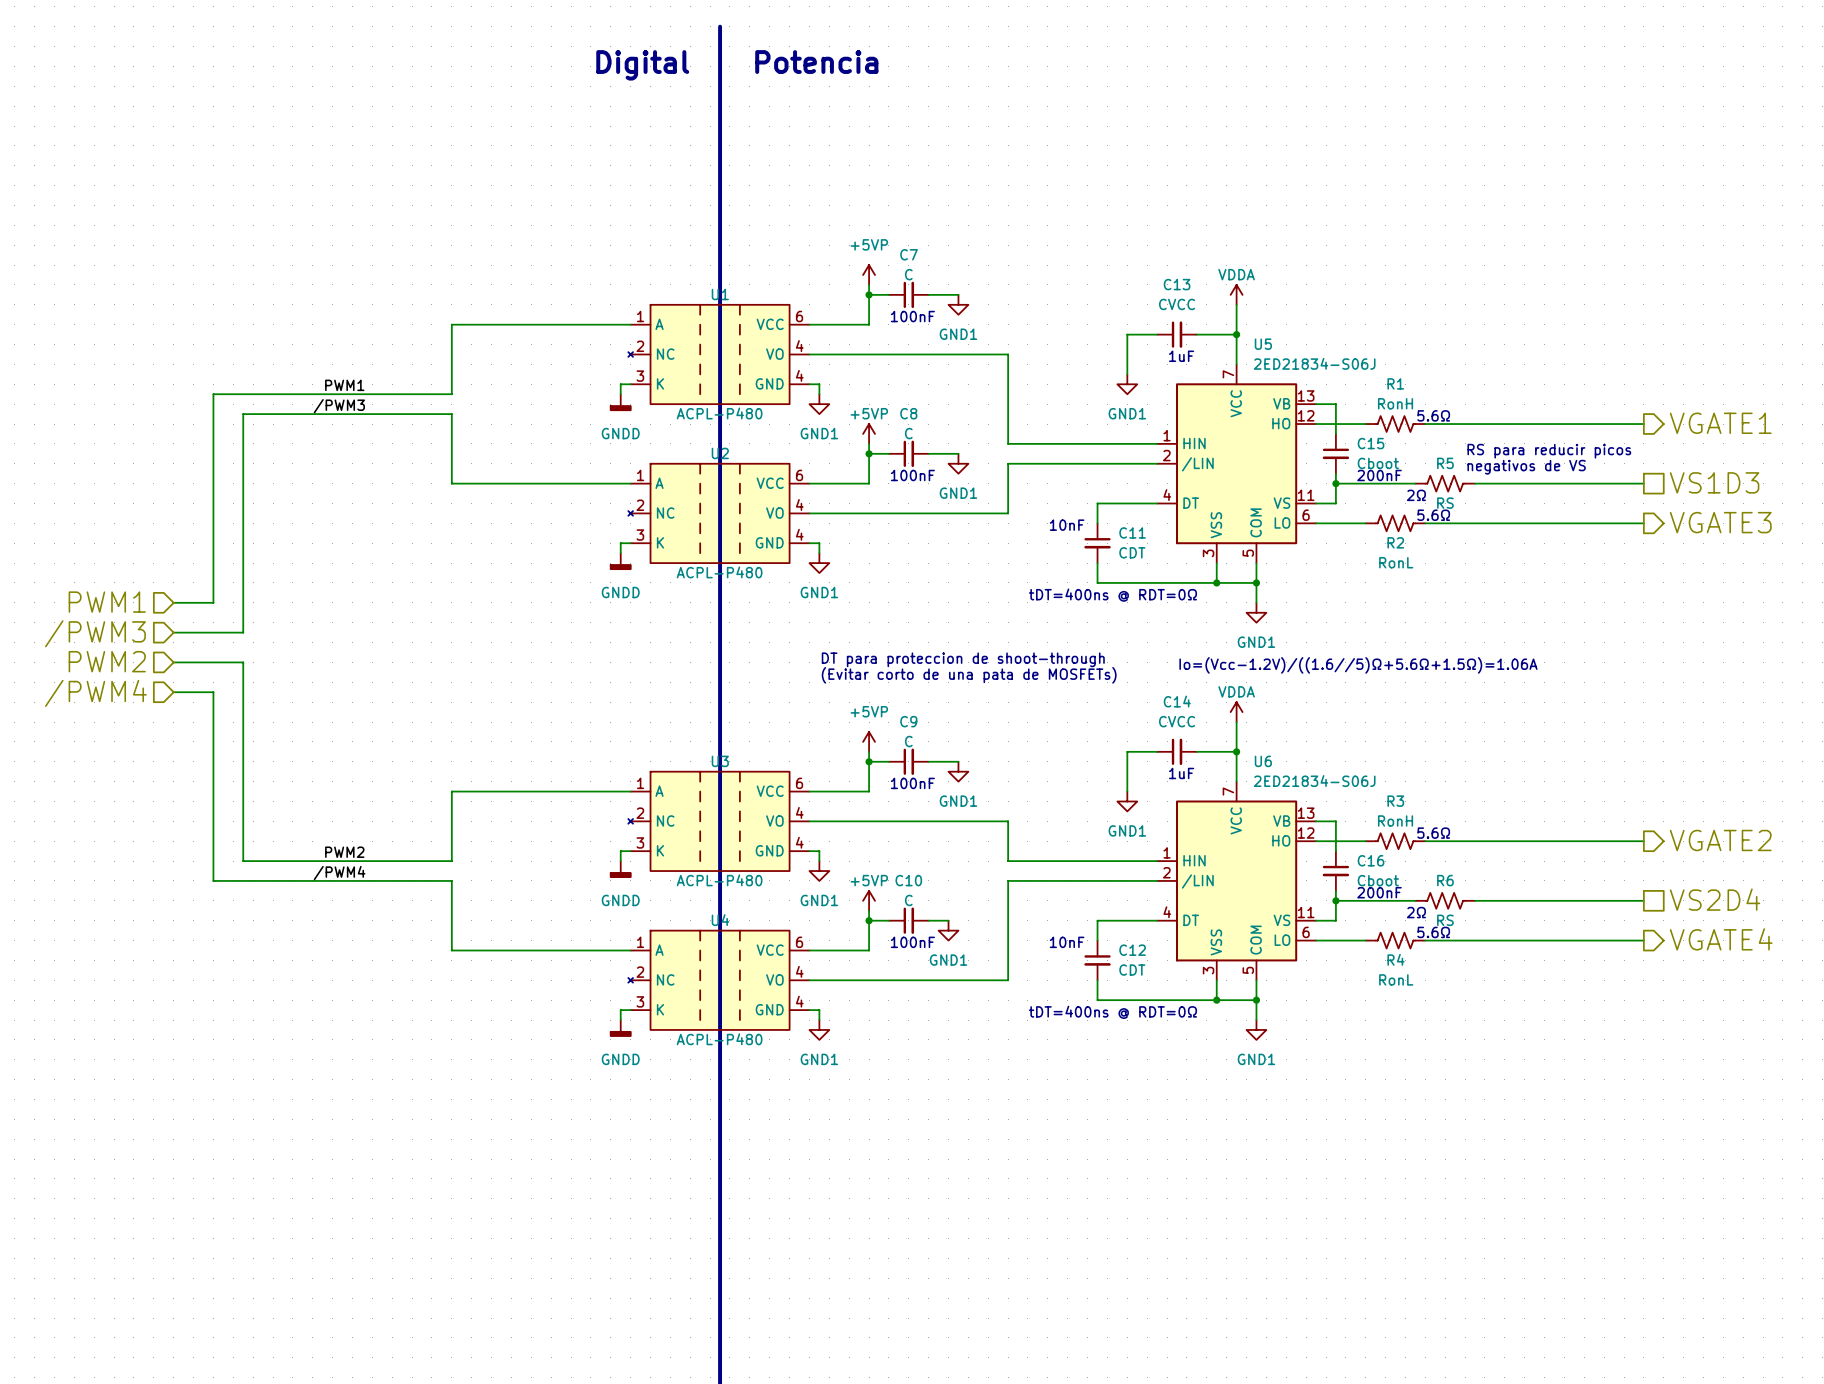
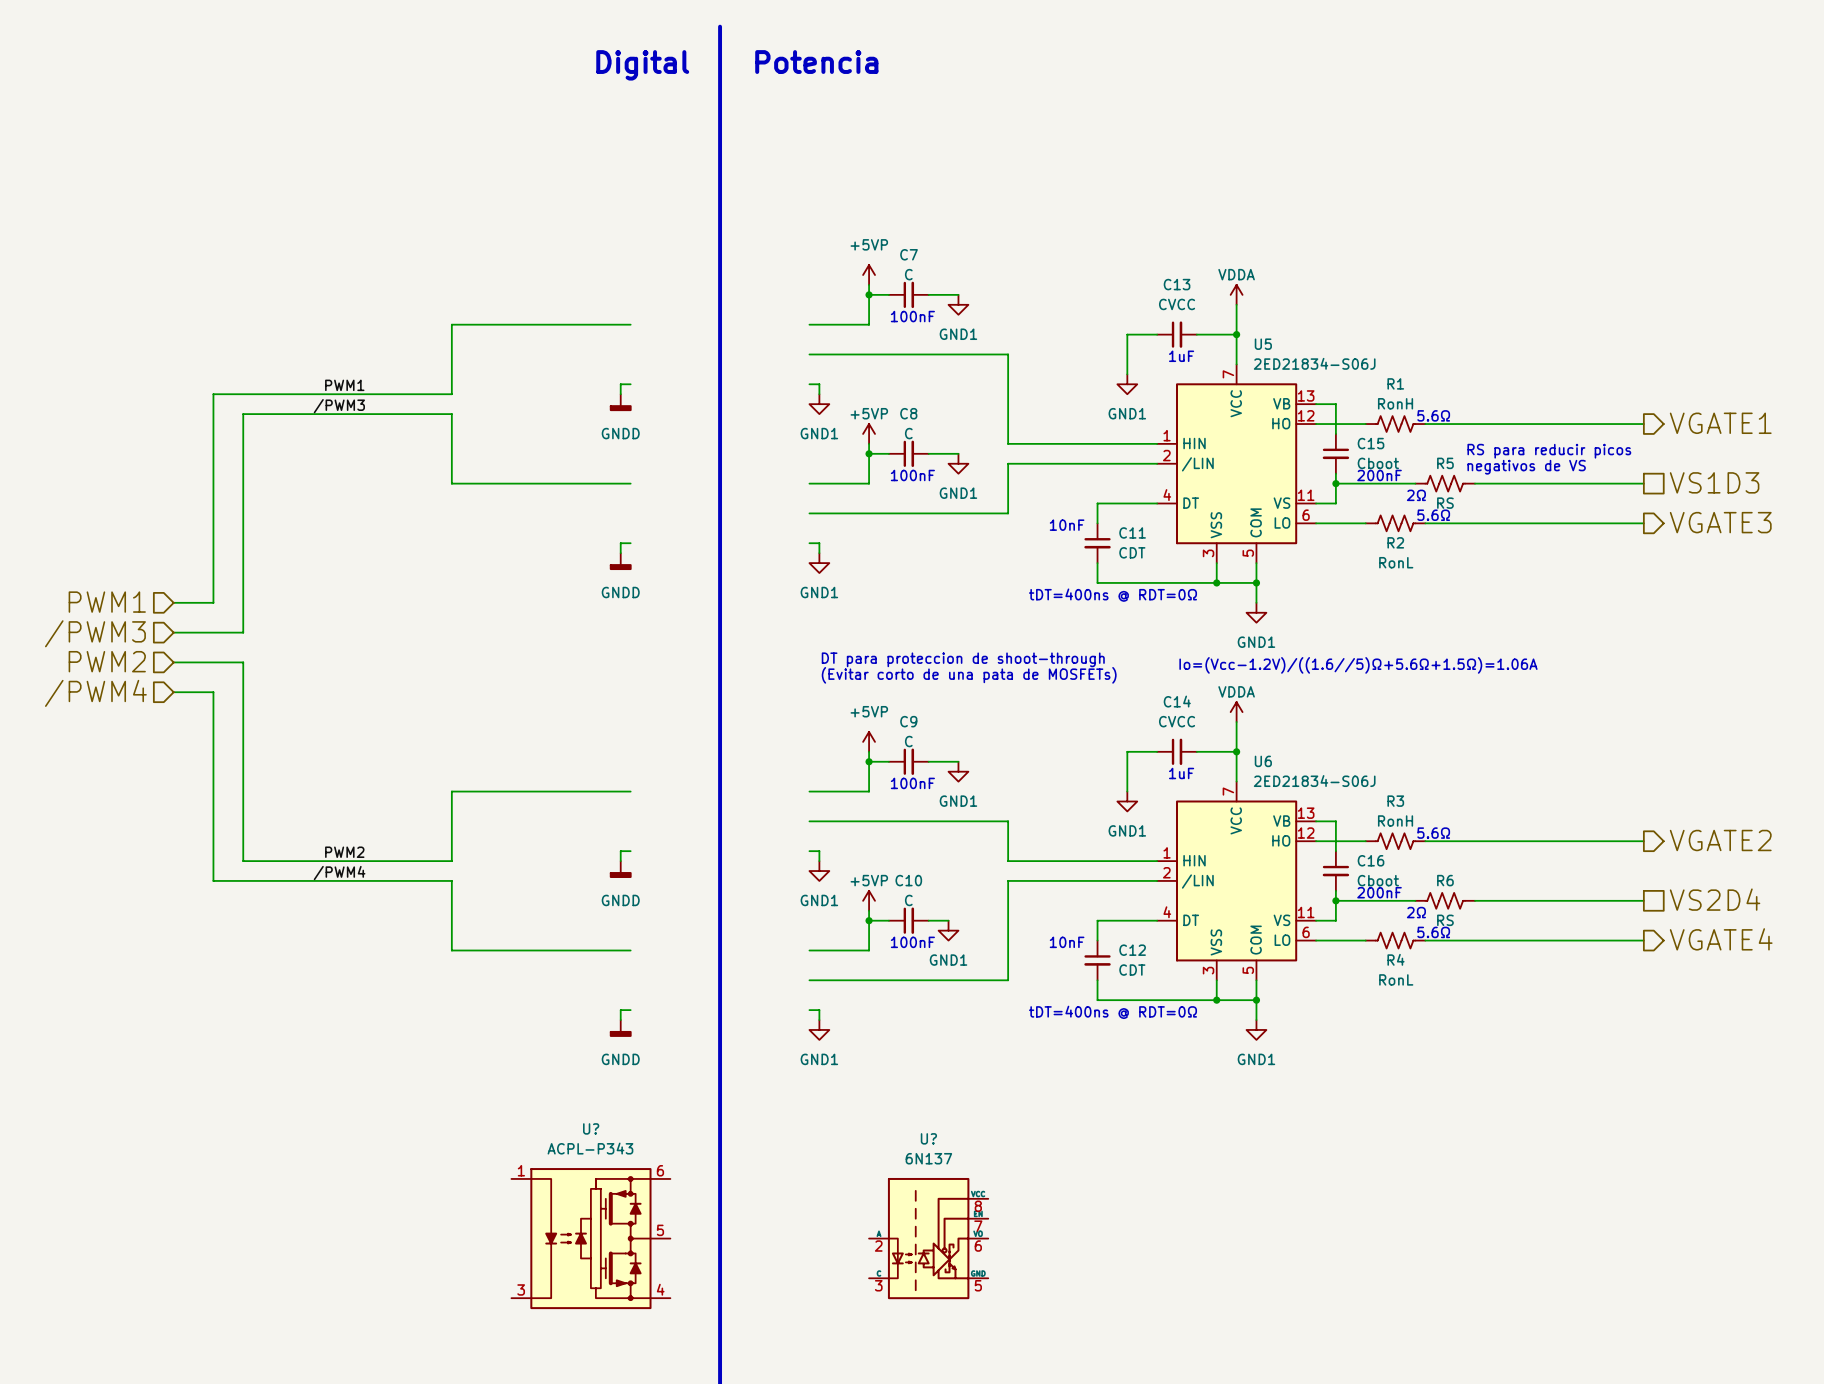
U1: ACPL-P480 (718, 354) -> none
U2: ACPL-P480 (718, 513) -> none
U3: ACPL-P480 (718, 821) -> none
U4: ACPL-P480 (718, 980) -> none
U?: none -> ACPL-P343 (590, 1238)
U?: none -> 6N137 (928, 1238)

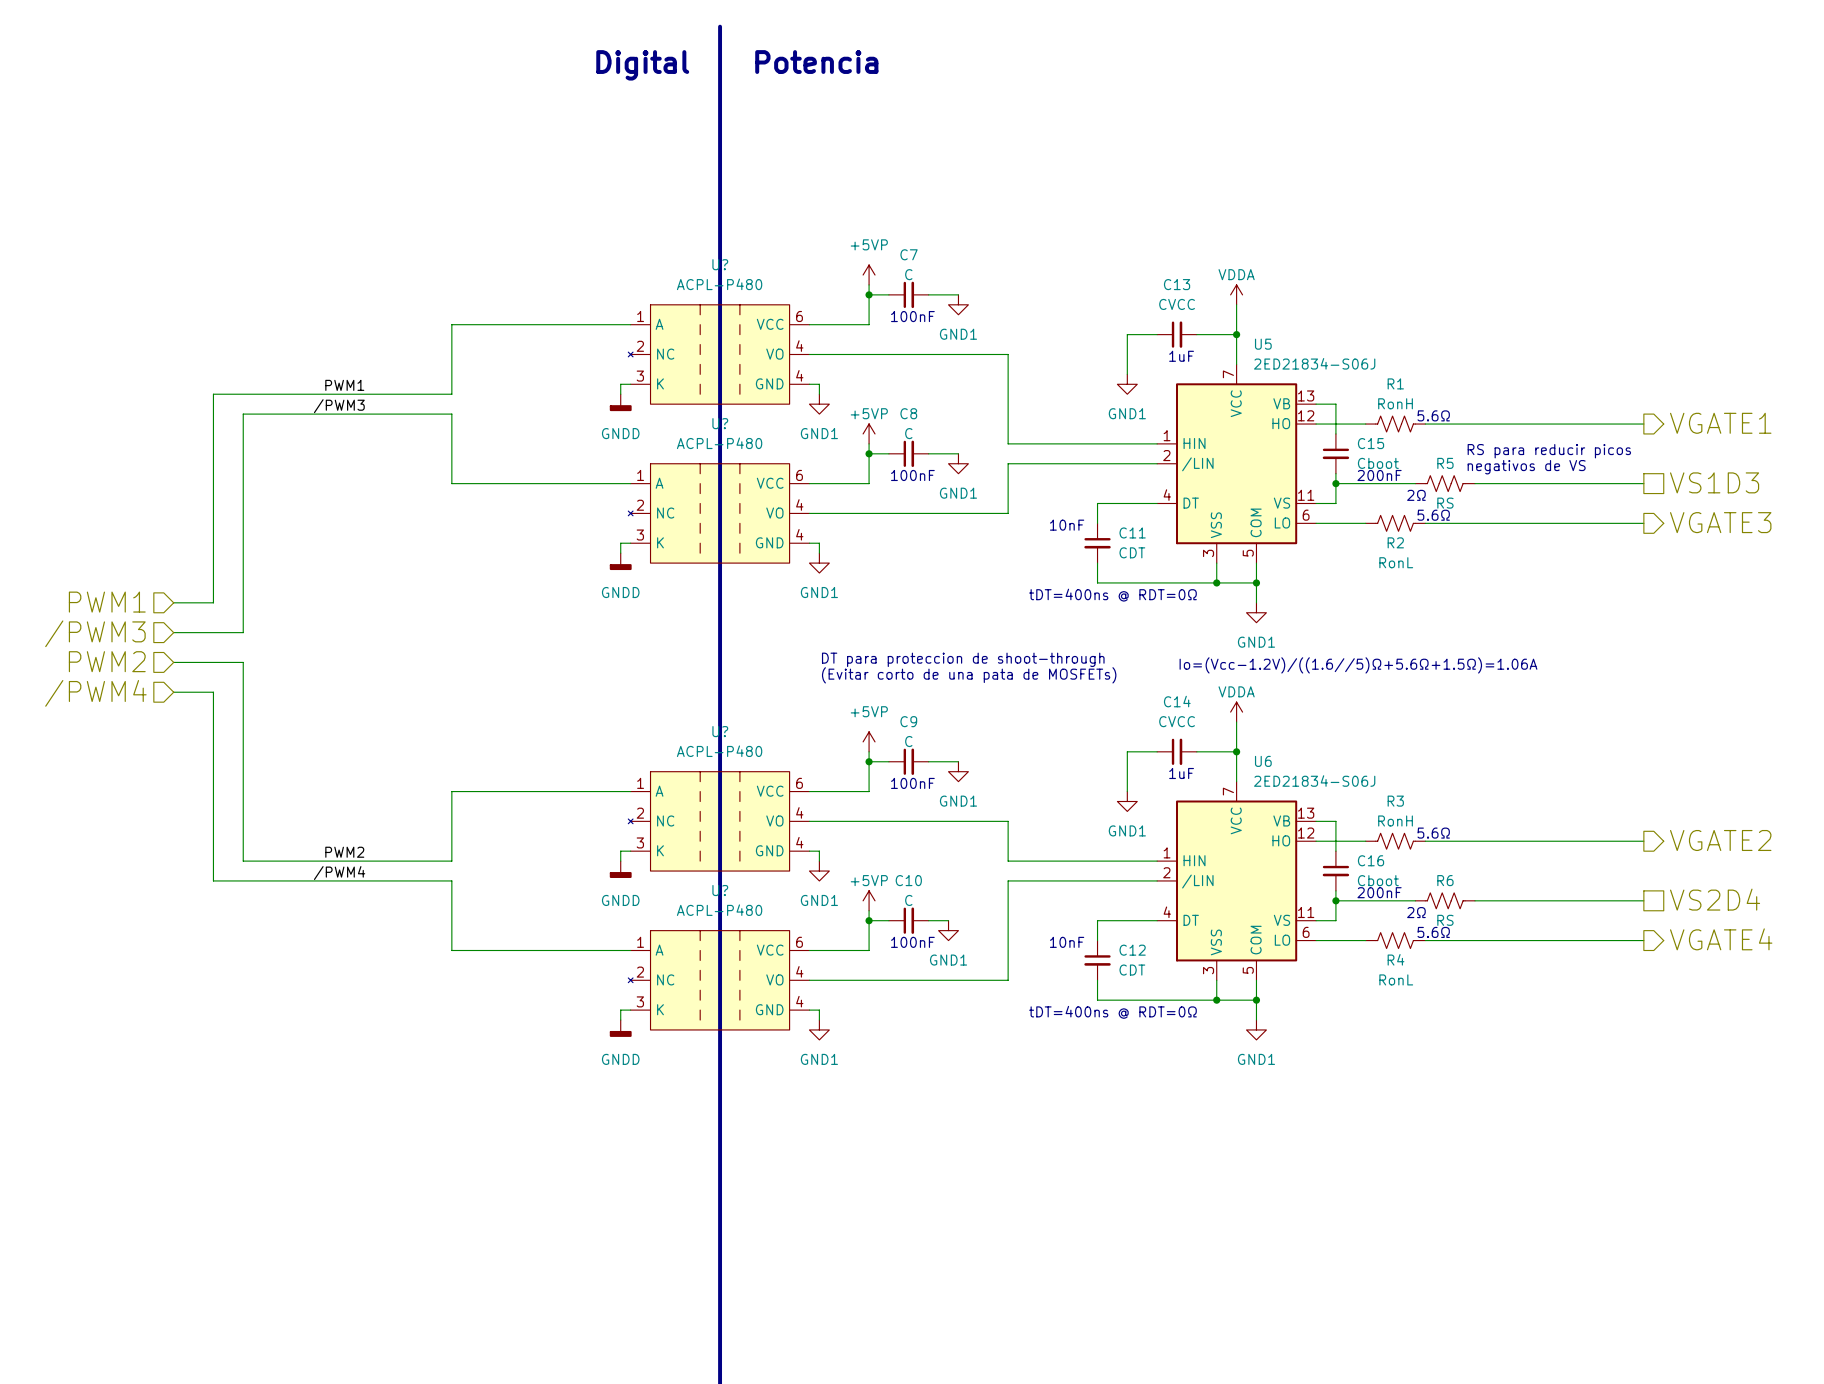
U?: none -> ACPL-P480 (718, 354)
U?: none -> ACPL-P480 (718, 513)
U?: none -> ACPL-P480 (718, 821)
U?: none -> ACPL-P480 (718, 980)
U?: ACPL-P343 (590, 1238) -> none
U?: 6N137 (928, 1238) -> none

